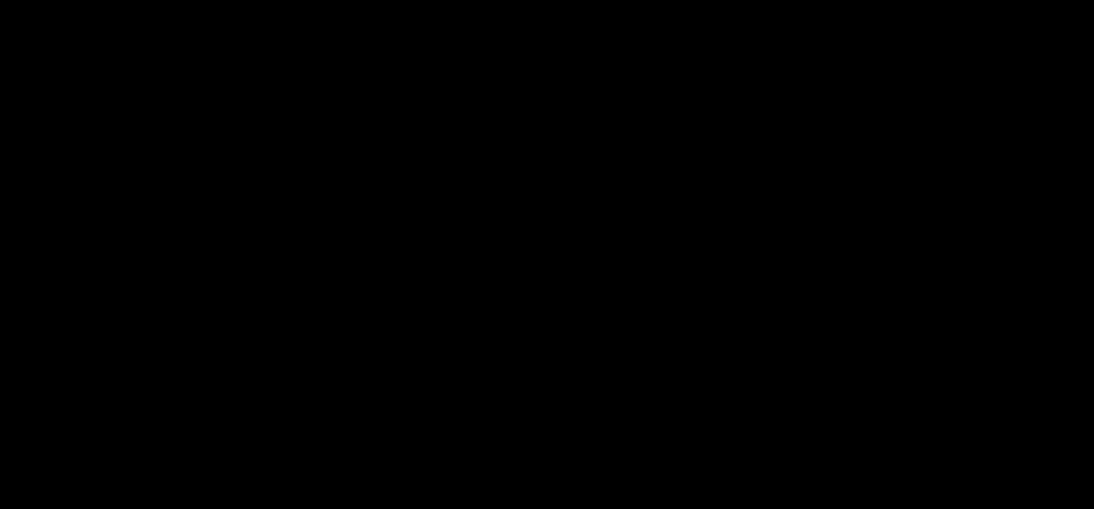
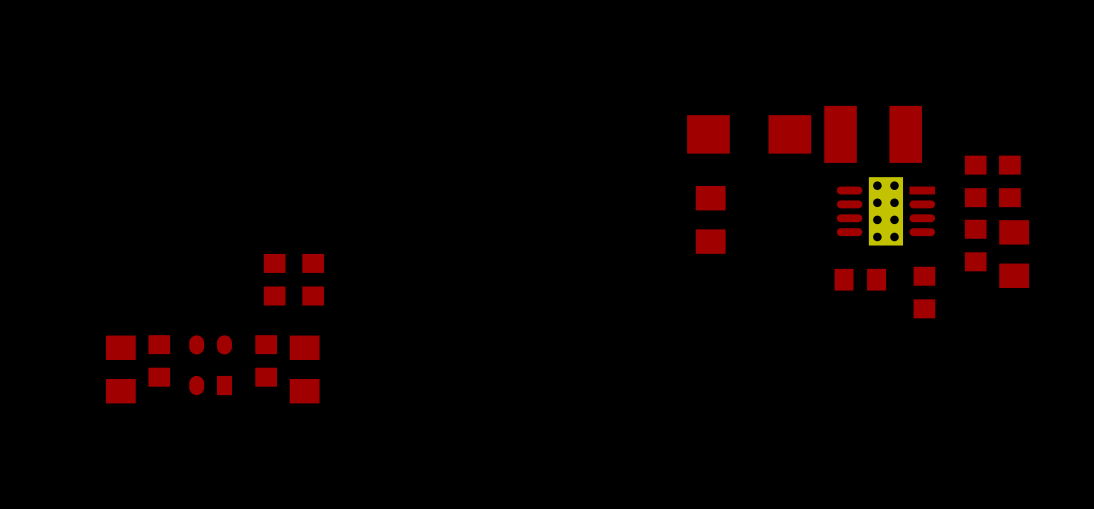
part: none -> (749, 134)
part: none -> (873, 134)
part: none -> (975, 181)
part: none -> (1009, 181)
part: none -> (885, 211)
part: none -> (710, 219)
part: none -> (975, 245)
part: none -> (1014, 254)
part: none -> (274, 279)
part: none -> (313, 279)
part: none -> (860, 279)
part: none -> (924, 292)
part: none -> (159, 360)
part: none -> (266, 360)
part: none -> (210, 365)
part: none -> (120, 369)
part: none -> (304, 369)

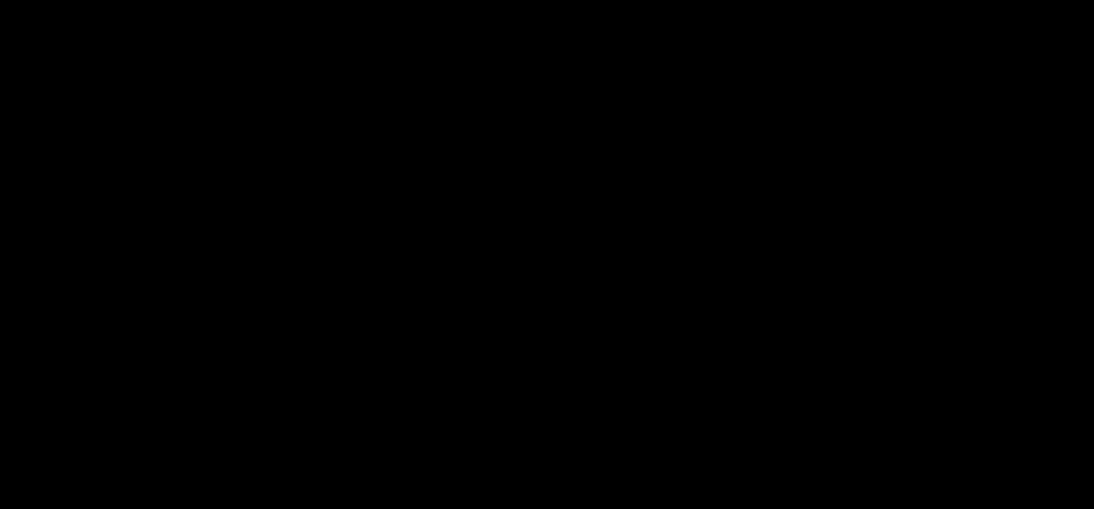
part: (749, 134) -> none
part: (873, 134) -> none
part: (975, 181) -> none
part: (1009, 181) -> none
part: (885, 211) -> none
part: (710, 219) -> none
part: (975, 245) -> none
part: (1014, 254) -> none
part: (274, 279) -> none
part: (313, 279) -> none
part: (860, 279) -> none
part: (924, 292) -> none
part: (159, 360) -> none
part: (266, 360) -> none
part: (210, 365) -> none
part: (120, 369) -> none
part: (304, 369) -> none

